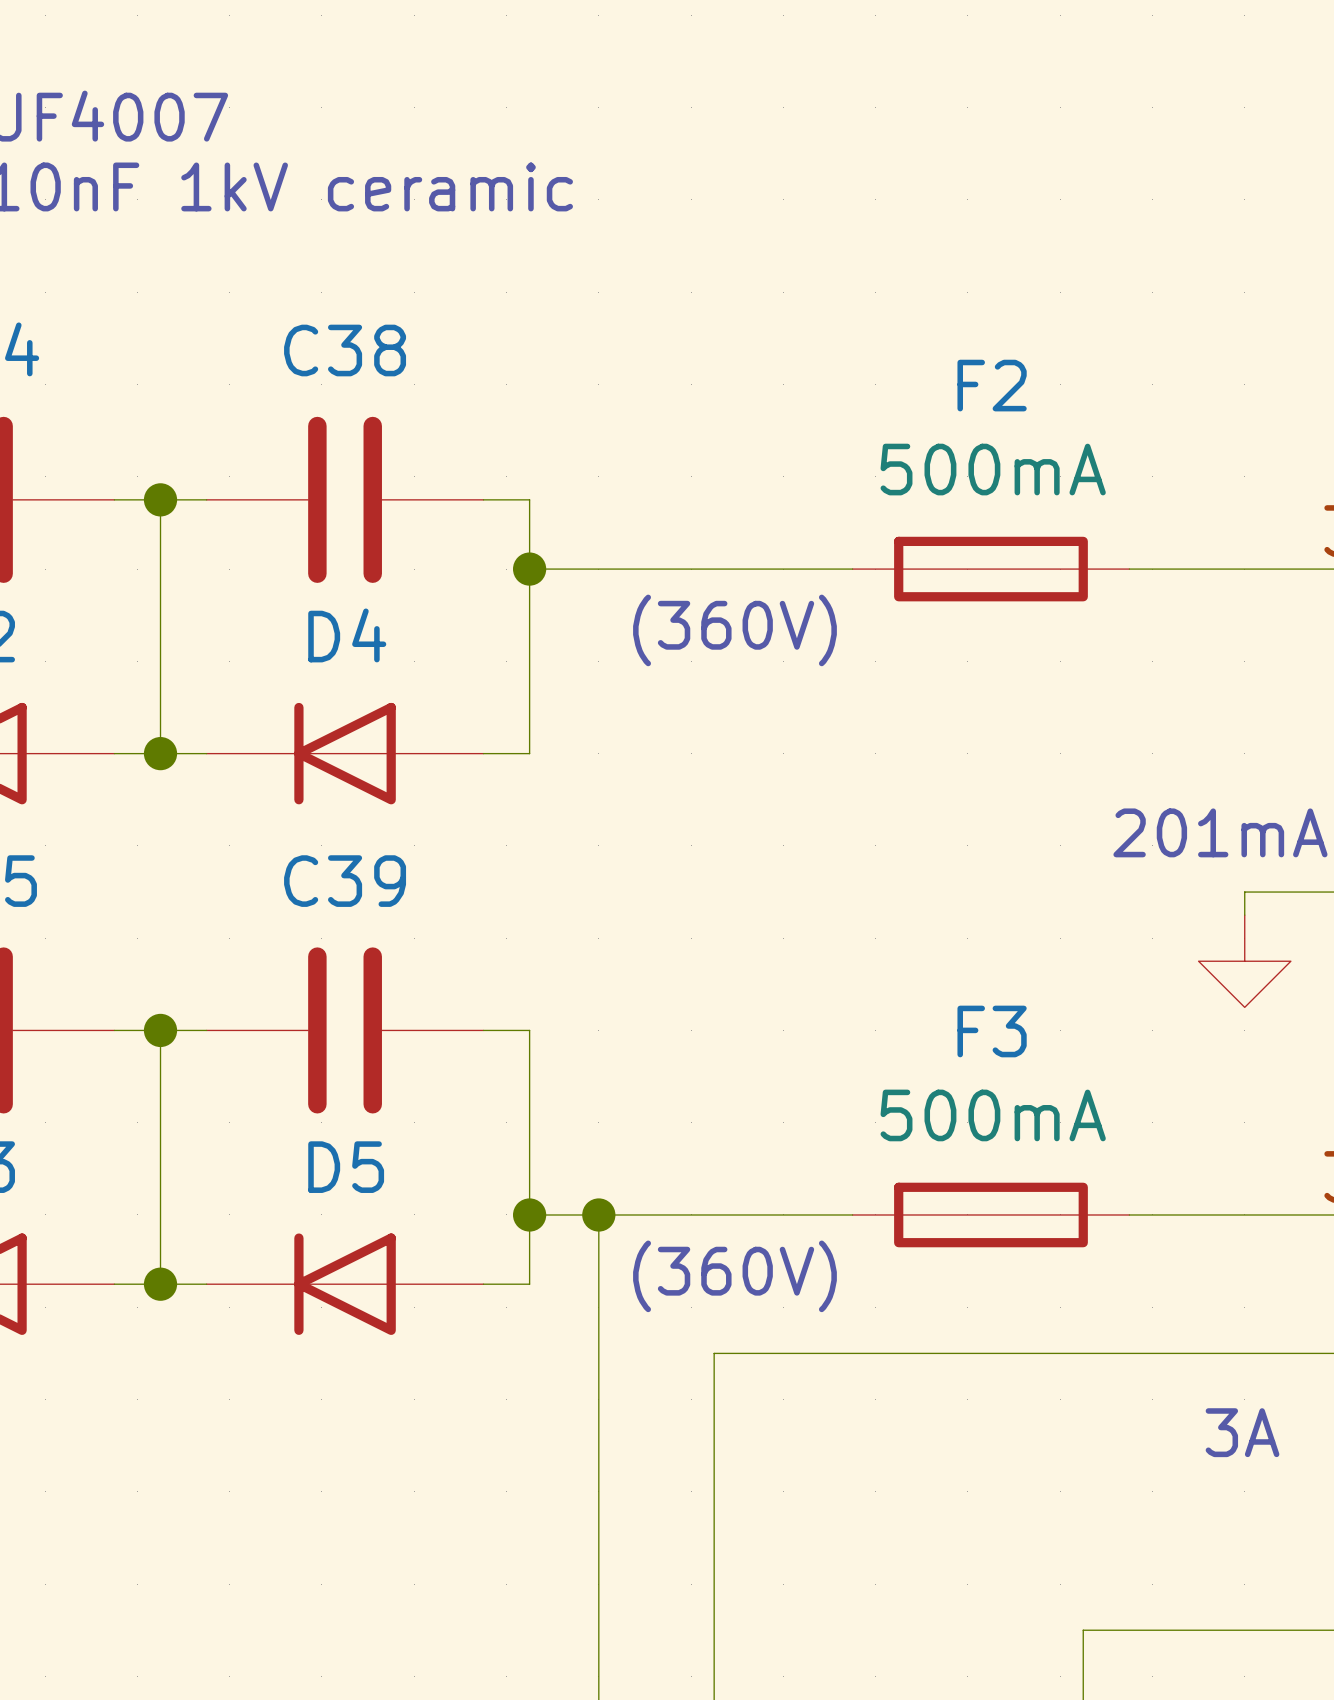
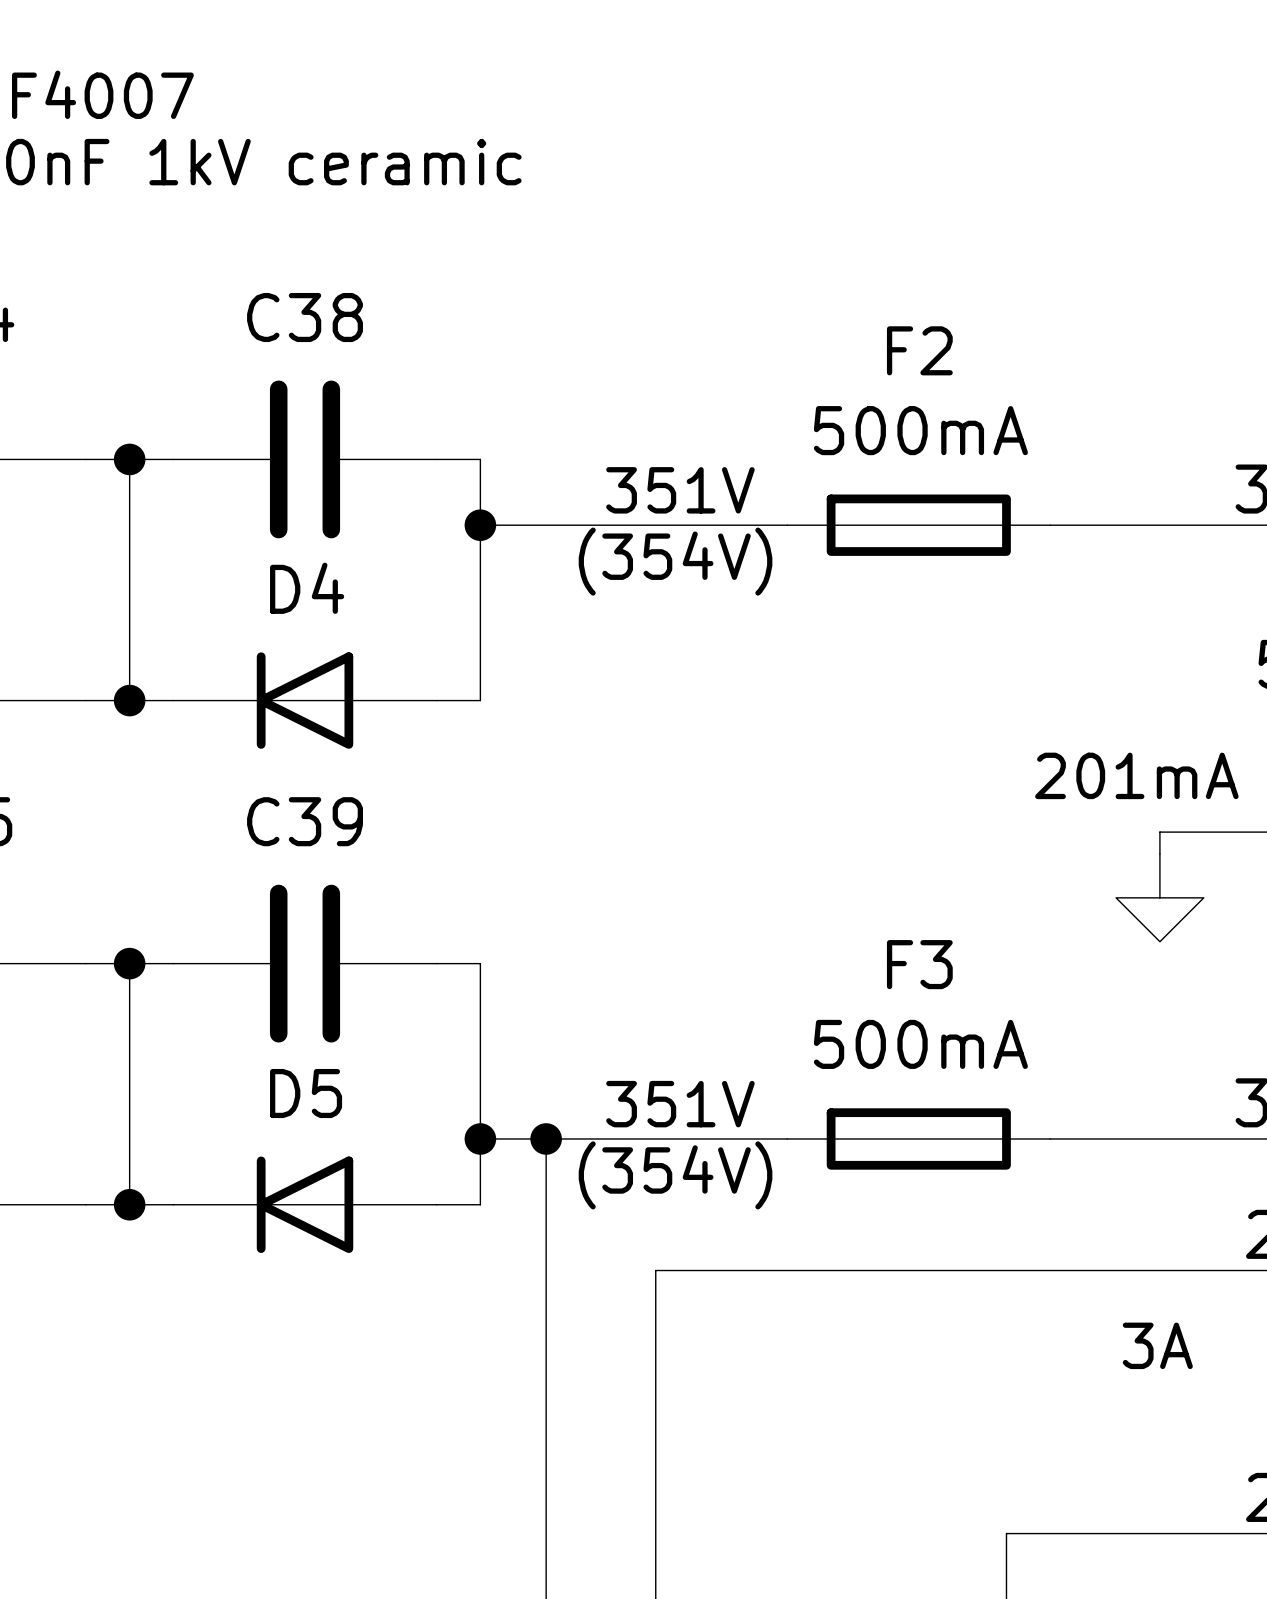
text: none -> 351V (680, 490)
text: (360V) (734, 630) -> (354V) (675, 561)
text: none -> 351V (680, 1104)
text: (360V) (734, 1276) -> (354V) (675, 1175)

